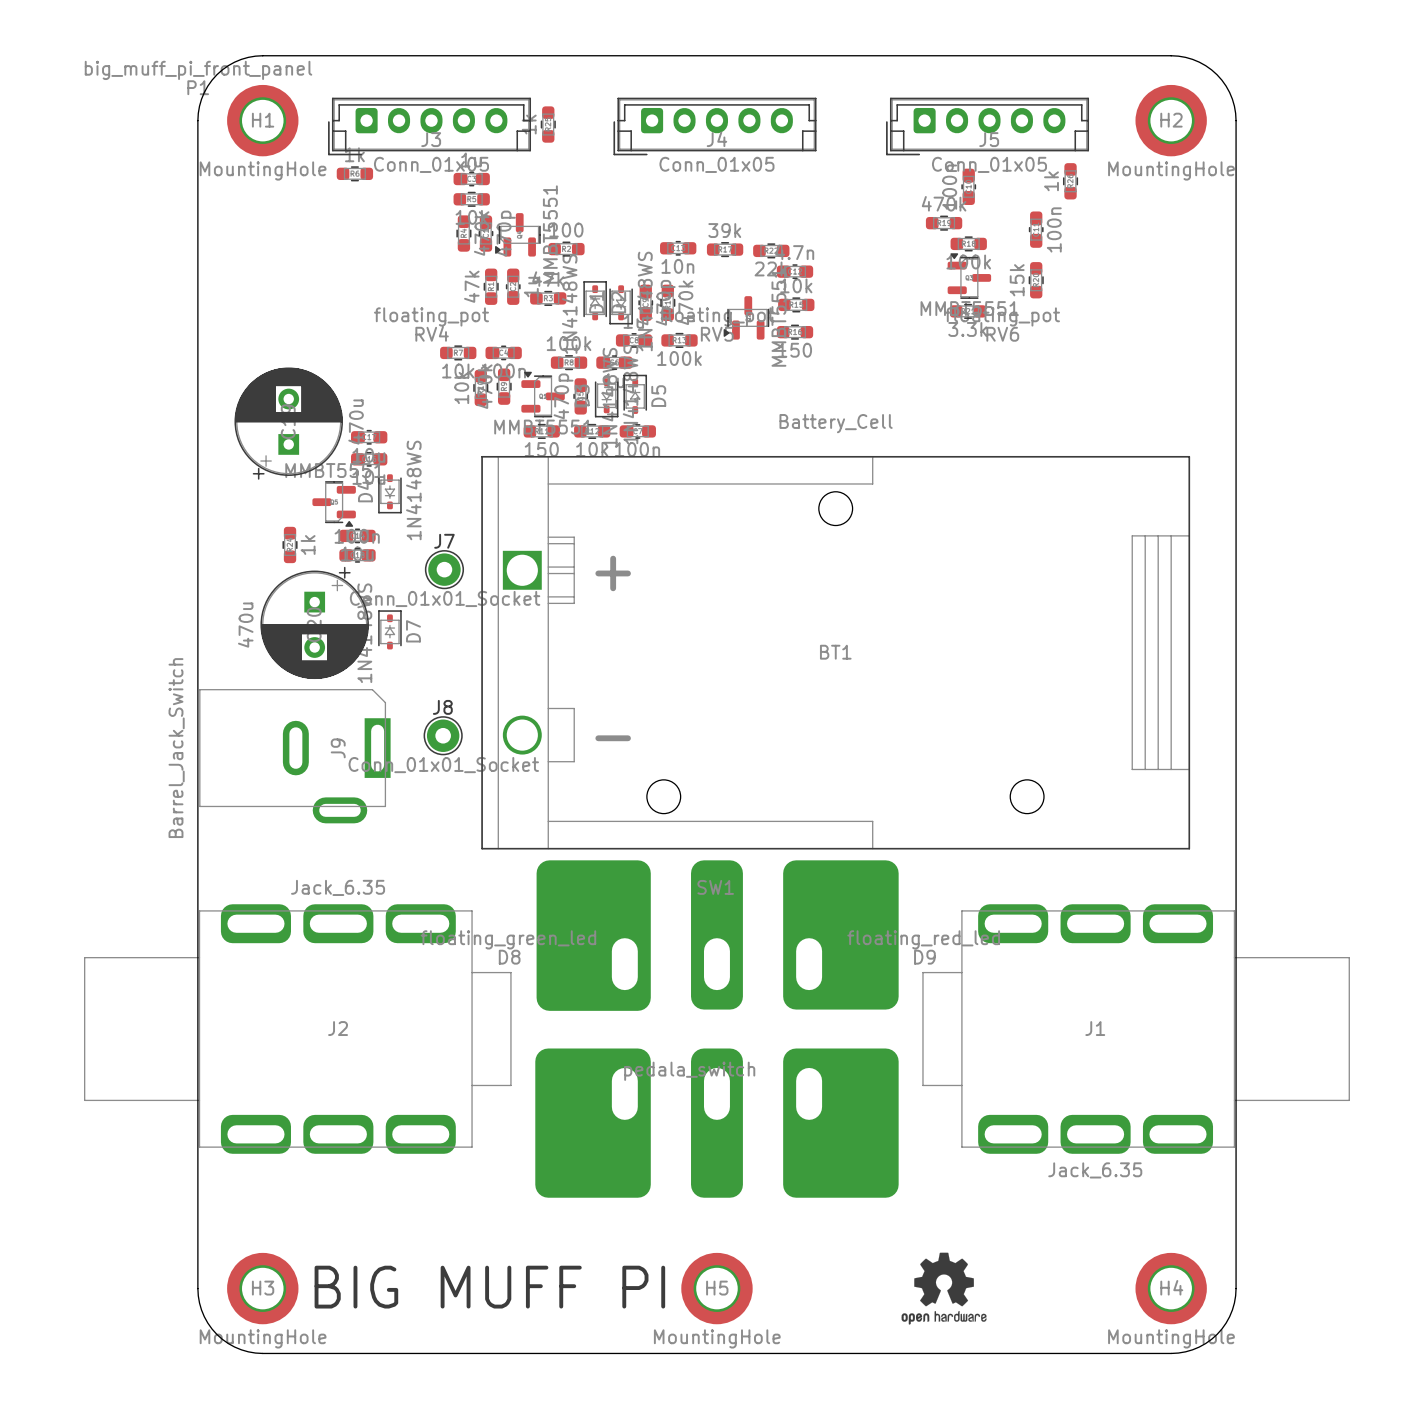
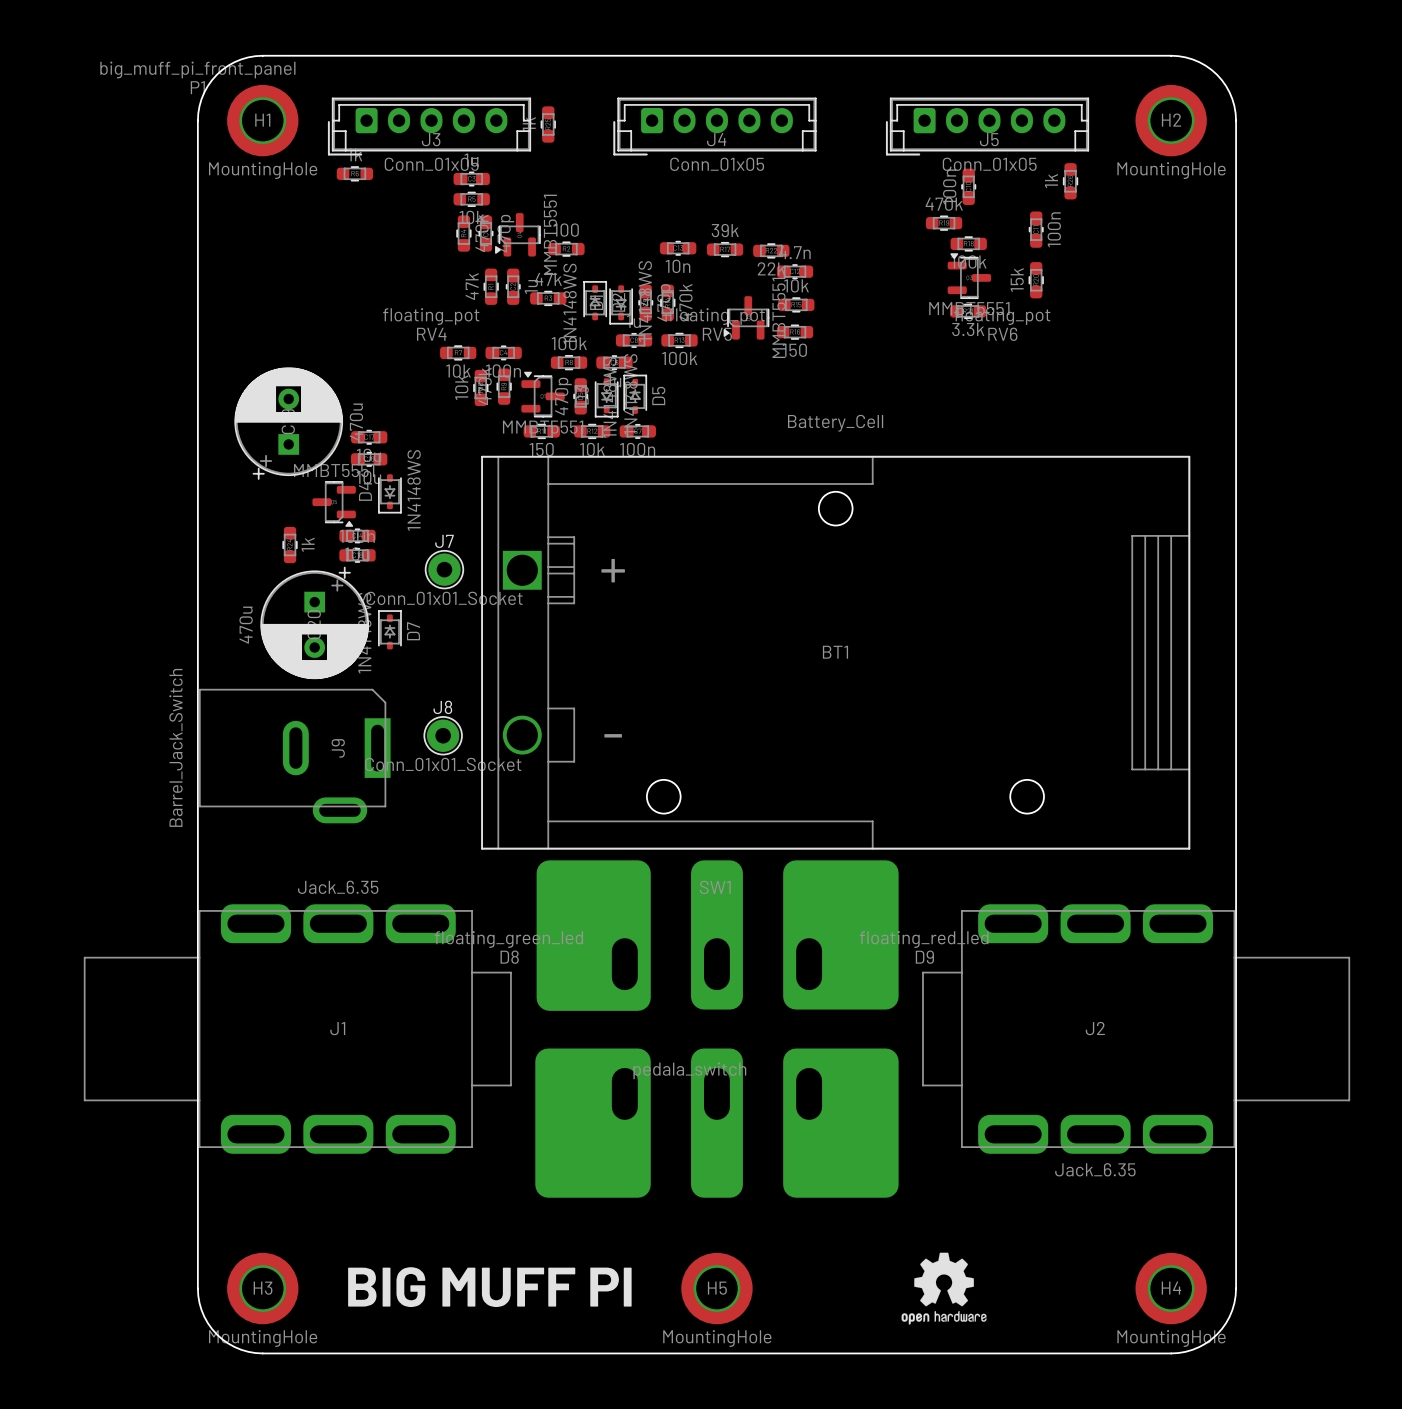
J2 name: J2 (338, 1028) -> J1 (337, 1028)
J1 name: J1 (1095, 1028) -> J2 (1095, 1028)

